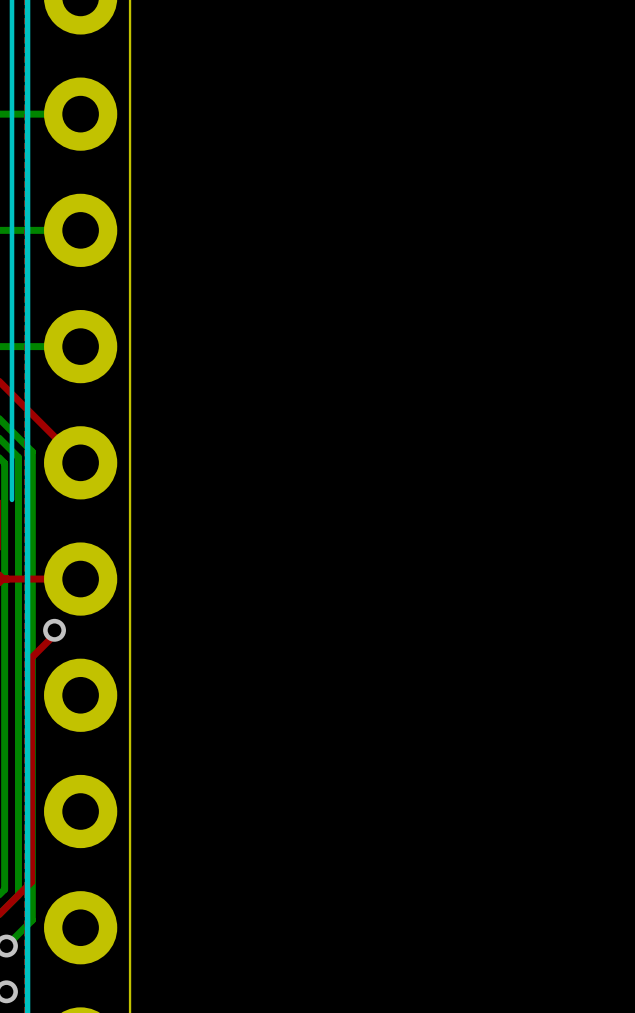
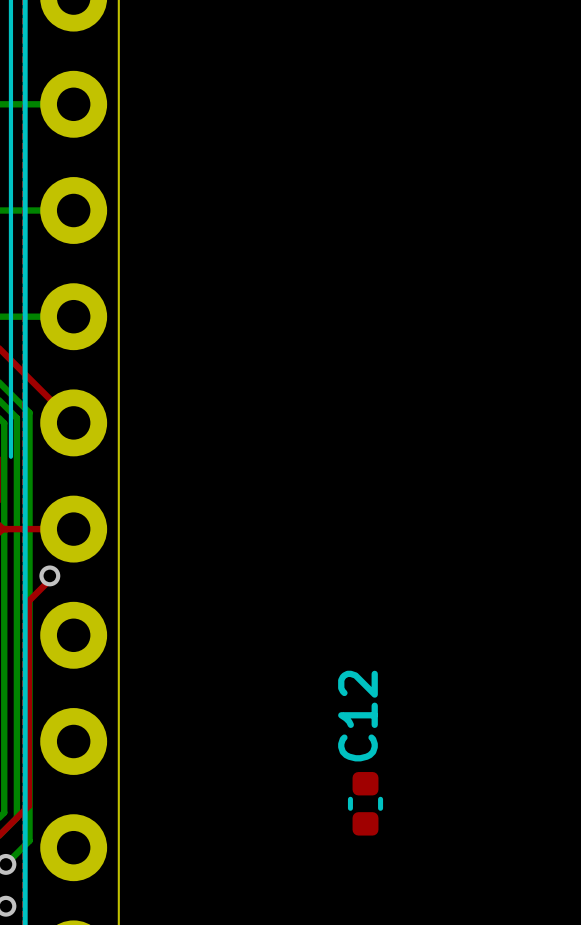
C12: none -> (365, 803)

